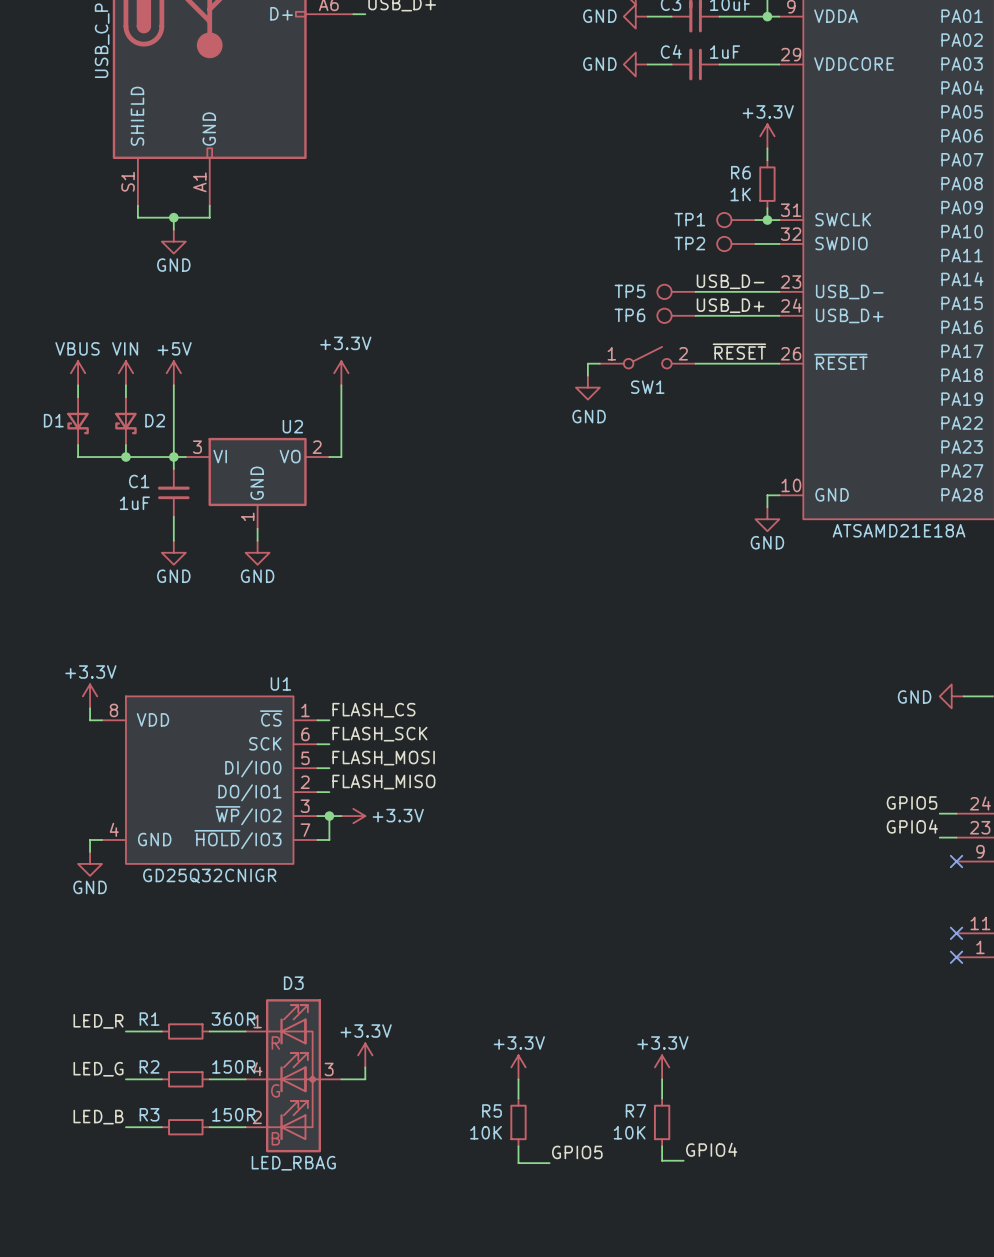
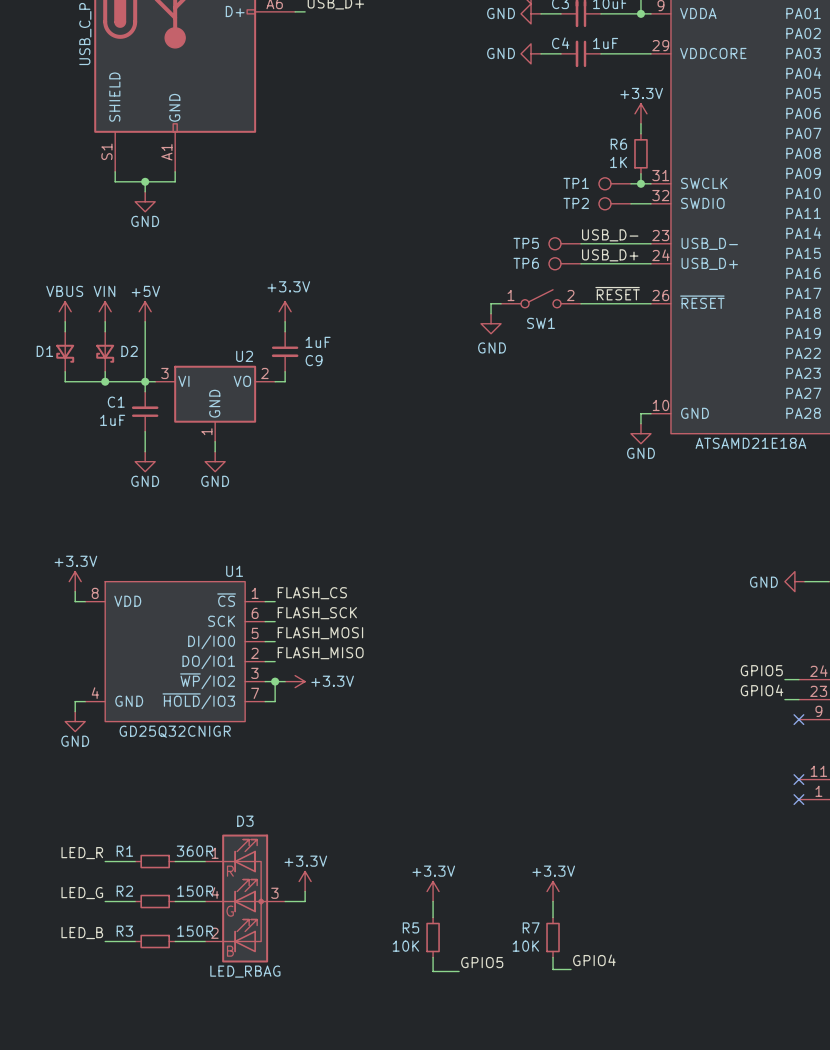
C9: none -> 1uF (285, 351)

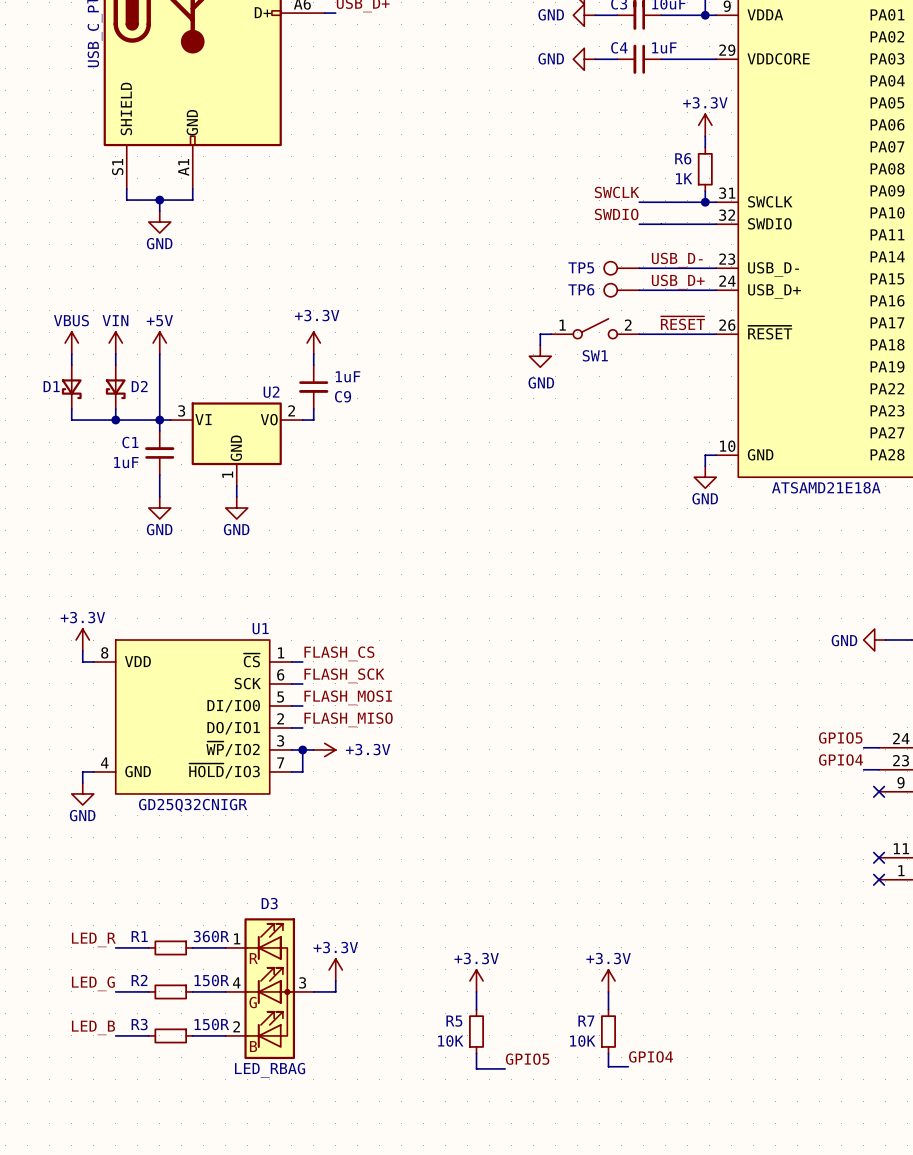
label: none -> SWCLK (617, 192)
wire: none -> (639, 202) (694, 202)
TP1: (614, 183) -> none
label: none -> SWDIO (616, 214)
wire: none -> (639, 224) (694, 224)
TP2: (614, 203) -> none

